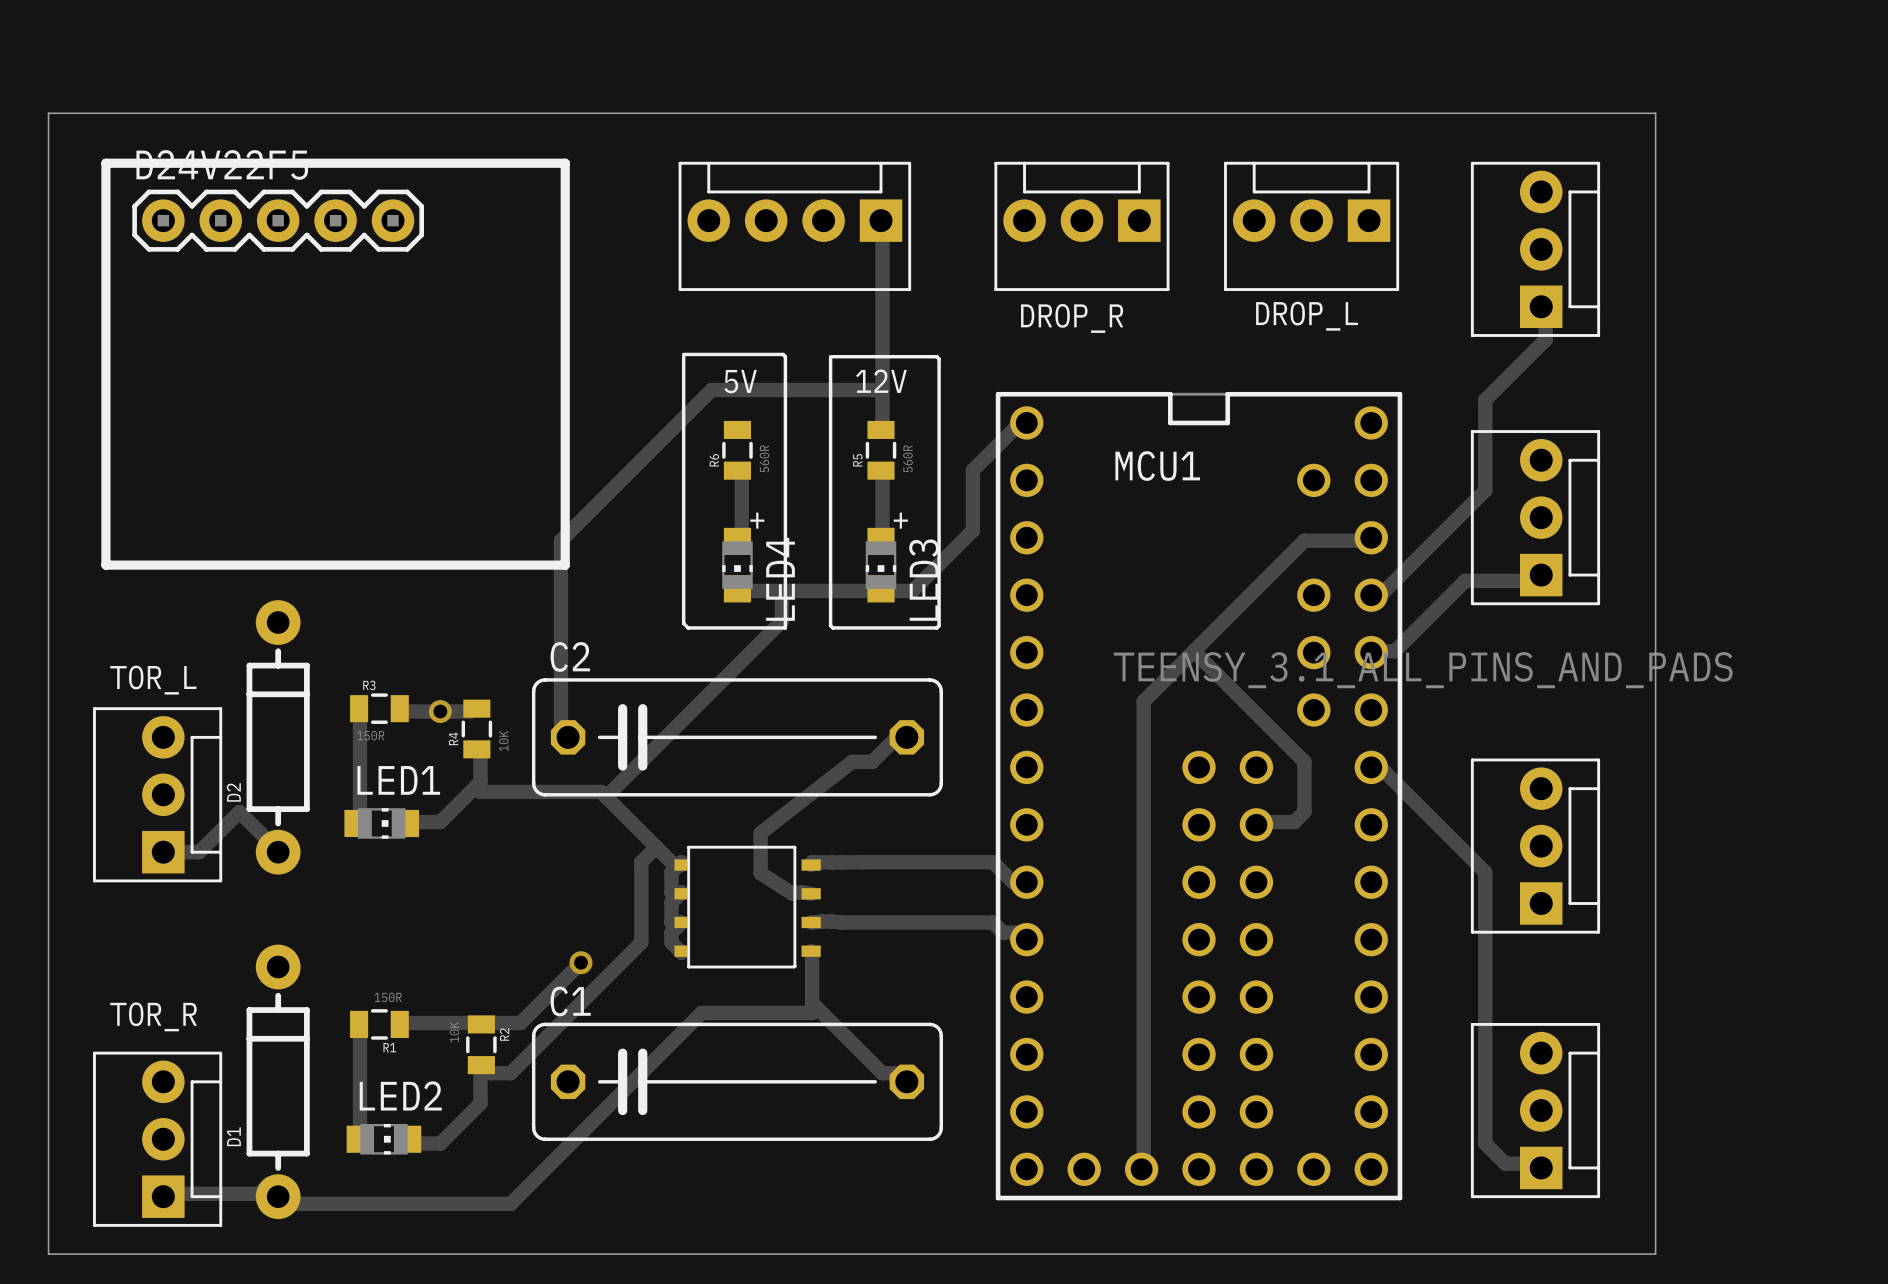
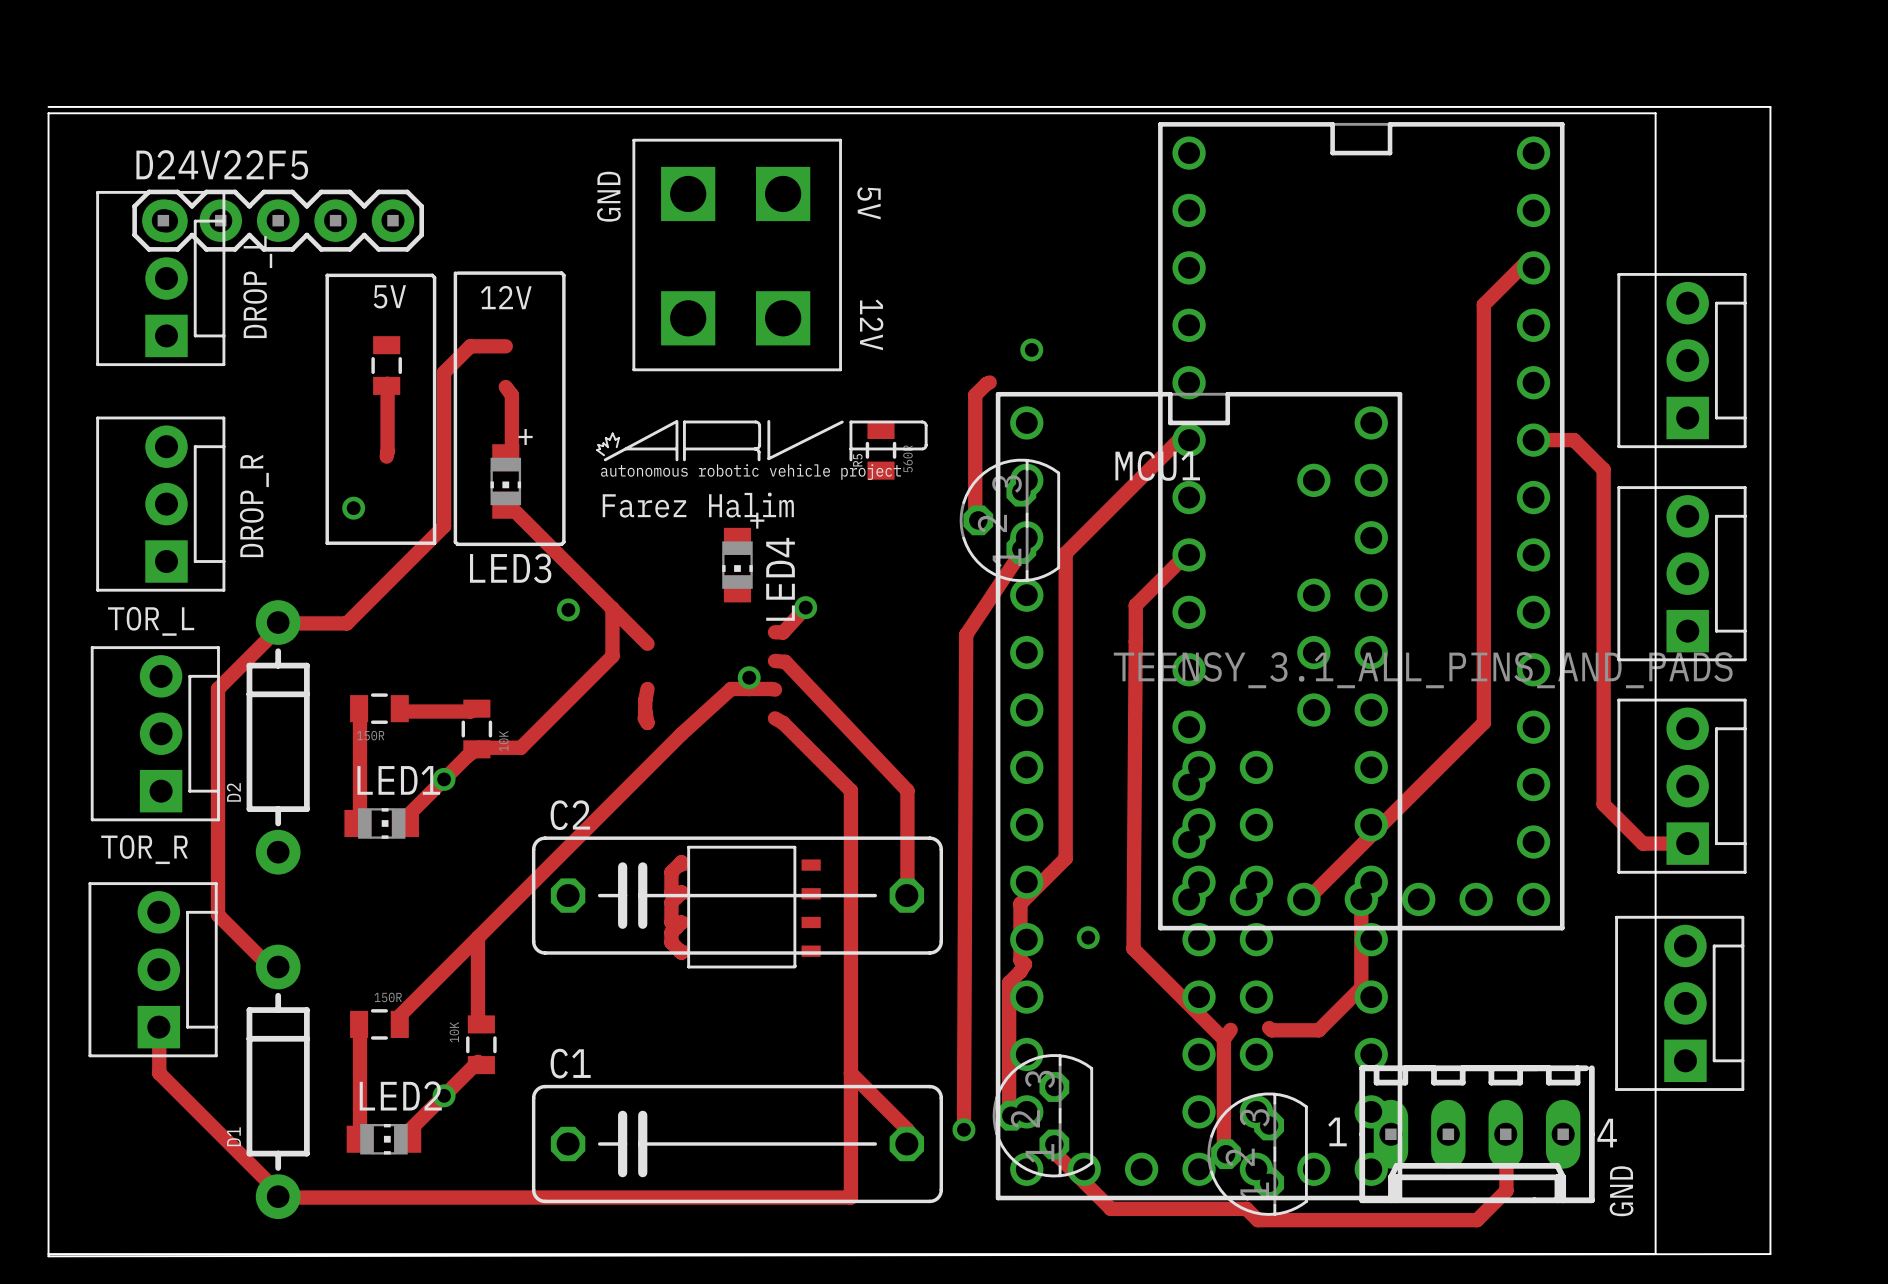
board edge: none -> (48, 106) (1770, 106) (1770, 1254) (48, 1256) (48, 1254)
line: (105, 163) (105, 565) (565, 565) (565, 163) (105, 163) -> none
text: none -> GND (608, 196)
text: none -> 5V (869, 203)
track: (881, 220) (881, 429) -> none
part: (794, 226) -> none
part: (1081, 226) -> none
part: (1311, 226) -> none
part: (1535, 249) -> none
part: none -> (737, 255)
track: none -> (1533, 267) (1529, 259) (1483, 304) (1483, 722) (1314, 892) (1303, 899)
line: none -> (327, 275) (432, 275) (434, 277) (434, 543) (327, 543) (327, 275)
part: none -> (160, 278)
text: none -> DROP_L (257, 287)
text: none -> 5V (389, 296)
text: none -> 12V (506, 297)
track: (1541, 306) (1545, 309) (1545, 339) (1485, 400) (1485, 490) (1384, 590) (1374, 590) (1371, 595) -> none
text: DROP_L (1307, 316) -> none
text: DROP_R (1072, 318) -> none
track: none -> (505, 346) (470, 346) (444, 372) (444, 526) (346, 623) (278, 622) (274, 632) (218, 688) (218, 915) (274, 971) (278, 967)
via: none -> (1031, 349)
line: (683, 354) (783, 354) (785, 356) (785, 627) (688, 627) (683, 623) (683, 356) -> none
line: (830, 356) (830, 625) (832, 627) (936, 627) (939, 625) (939, 358) (936, 356) (832, 356) -> (455, 273) (455, 542) (457, 544) (561, 544) (563, 542) (563, 275) (561, 273) (457, 273)
part: none -> (1681, 360)
part: none -> (386, 365)
text: 5V (740, 381) -> none
text rotation: 0° (881, 381) -> 90° clockwise (871, 324)
track: none -> (989, 382) (975, 395) (975, 519) (978, 520)
track: none -> (386, 385) (387, 383) (386, 456)
track: none -> (505, 387) (511, 395) (511, 451) (505, 457)
track: (882, 390) (711, 390) (560, 540) (560, 731) (568, 737) -> none
drawing: none -> [596, 419, 928, 462]
track: (1026, 422) (1023, 420) (972, 470) (972, 530) (912, 590) (882, 590) (881, 588) (872, 590) (741, 590) (737, 588) -> none
track: none -> (1189, 440) (1178, 440) (1065, 553) (1065, 858) (1020, 903) (1020, 960) (1024, 964) (1009, 982) (1009, 1107) (1011, 1115)
track: none -> (1540, 440) (1533, 440) (1574, 440) (1603, 469) (1603, 804) (1642, 843) (1687, 843)
R6: 560R (737, 450) -> none
track: (737, 470) (741, 470) (741, 540) (737, 541) -> none
track: (881, 470) (881, 541) -> none
part: none -> (160, 504)
text: none -> DROP_R (254, 505)
track: none -> (505, 505) (511, 508) (647, 643)
text: none -> Farez Halim (698, 505)
via: none -> (353, 508)
part: (1535, 517) -> none
part: none -> (1009, 520)
part: none -> (1361, 526)
track: (1371, 537) (1364, 540) (1304, 540) (1143, 701) (1143, 1163) (1141, 1169) -> none
track: none -> (1021, 549) (1020, 553) (966, 634) (963, 1129)
track: none -> (1189, 554) (1186, 554) (1135, 605) (1133, 948) (1223, 1039)
LED3 position: (881, 565) -> (505, 481)
part: none -> (1681, 573)
track: (1541, 575) (1535, 580) (1465, 580) (1394, 651) (1371, 652) -> none
LED3 name rotation: 0° (924, 580) -> 90° clockwise (510, 568)
track: (781, 590) (781, 621) (606, 796) -> none
track: none -> (805, 607) (783, 632) (774, 632)
via: none -> (805, 607)
via: none -> (568, 609)
track: (1193, 651) (1304, 761) (1304, 812) (1294, 822) (1264, 822) (1256, 824) -> none
track: none -> (774, 660) (785, 661) (907, 790) (906, 895)
via: none -> (749, 677)
text position: TOR_L (153, 680) -> TOR_L (151, 621)
R3 name: R3 (369, 685) -> none
track: none -> (647, 688) (645, 700) (647, 722) (644, 718)
via position: (440, 711) -> (444, 779)
track: none -> (774, 718) (783, 722) (850, 790) (850, 1197) (278, 1196) (278, 1192) (159, 1073) (158, 1027)
C2 position: (737, 737) -> (737, 895)
track: (906, 737) (902, 731) (872, 761) (852, 761) (760, 833) (760, 873) (792, 893) (811, 893) -> none
R4 name: R4 (453, 738) -> none
track: (476, 749) (480, 751) (480, 781) (440, 822) (405, 823) -> (612, 608) (612, 656) (520, 747) (478, 747) (466, 756) (410, 813) (405, 823)
track: (1371, 767) (1374, 771) (1384, 771) (1485, 872) (1485, 1143) (1505, 1163) (1535, 1163) (1541, 1167) -> none
track: (475, 786) (480, 791) (601, 791) (676, 867) -> none
part: none -> (1681, 786)
part position: (157, 794) -> (155, 733)
part: (1535, 846) -> none
track: (656, 847) (641, 862) (641, 942) (510, 1073) (490, 1073) (481, 1065) (480, 1103) (440, 1143) (410, 1143) (407, 1139) -> (481, 1065) (477, 1061) (410, 1129) (407, 1139)
track: (163, 852) (199, 852) (239, 812) (278, 852) -> none
track: (811, 865) (812, 862) (992, 862) (1013, 882) (1026, 882) -> none
track: none -> (1361, 899) (1361, 987) (1318, 1030) (1271, 1030) (1269, 1028)
track: (811, 922) (992, 922) (1003, 932) (1023, 932) (1026, 939) -> none
track: none -> (477, 937) (477, 1016) (481, 1024)
via: none -> (1088, 937)
track: (811, 951) (812, 1002) (882, 1073) (902, 1073) (906, 1081) -> none
track: (581, 962) (520, 1022) (399, 1024) -> (774, 689) (731, 688) (681, 734) (398, 1016) (399, 1024)
via: (581, 962) -> none
part: none -> (153, 969)
part: none -> (1679, 1003)
track: (817, 1007) (812, 1012) (701, 1012) (510, 1203) (279, 1203) (279, 1183) (269, 1183) (259, 1193) (169, 1193) (163, 1196) -> none
text position: TOR_R (153, 1016) -> TOR_R (144, 849)
track: none -> (1230, 1029) (1223, 1039)
R2 name: R2 (504, 1034) -> none
track: none -> (1223, 1039) (1223, 1152) (1226, 1154)
R1 name: R1 (389, 1047) -> none
track: none -> (850, 1073) (907, 1129) (906, 1143)
C1 position: (737, 1081) -> (737, 1143)
via: none -> (444, 1095)
part: (1535, 1110) -> none
part: none -> (1042, 1115)
via: none -> (963, 1129)
part: none -> (1477, 1134)
track: none -> (1505, 1134) (1506, 1190) (1477, 1220) (1257, 1220) (1246, 1208) (1110, 1208) (1054, 1152) (1054, 1144)
part: (157, 1139) -> none
part: none -> (1257, 1154)
text: none -> GND (1621, 1191)

